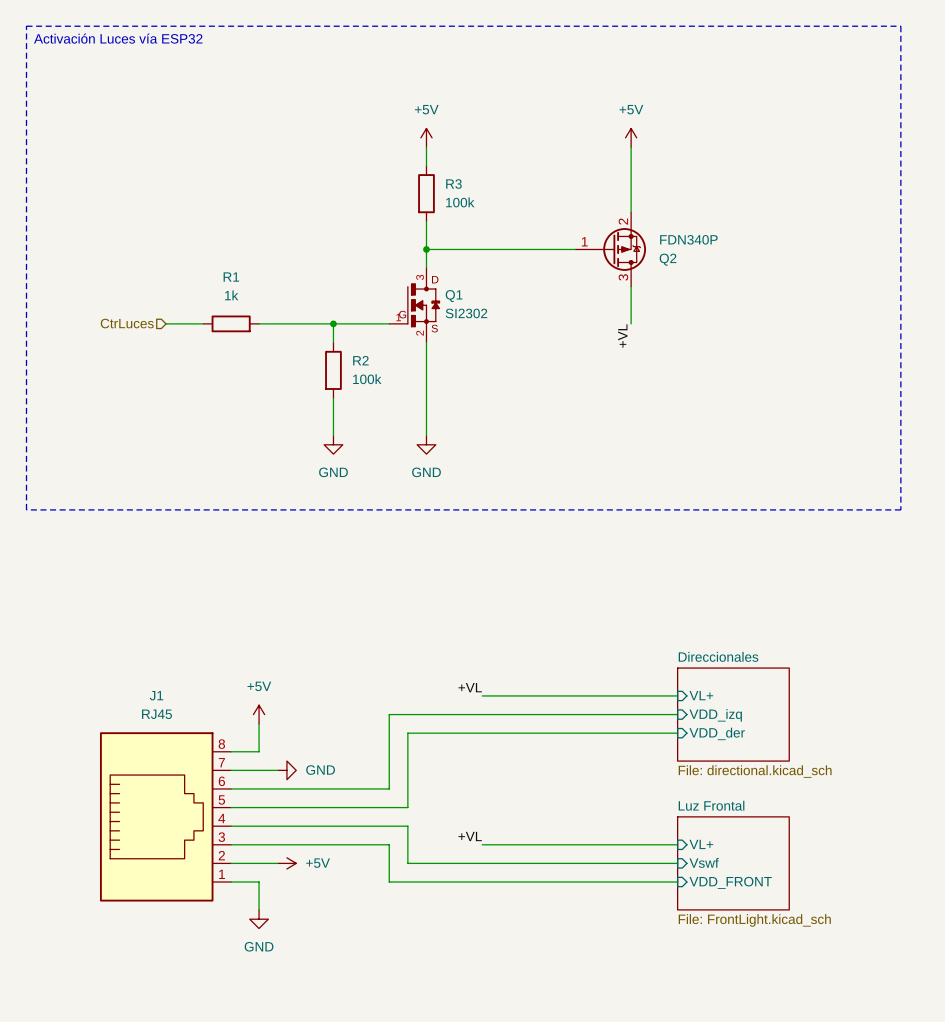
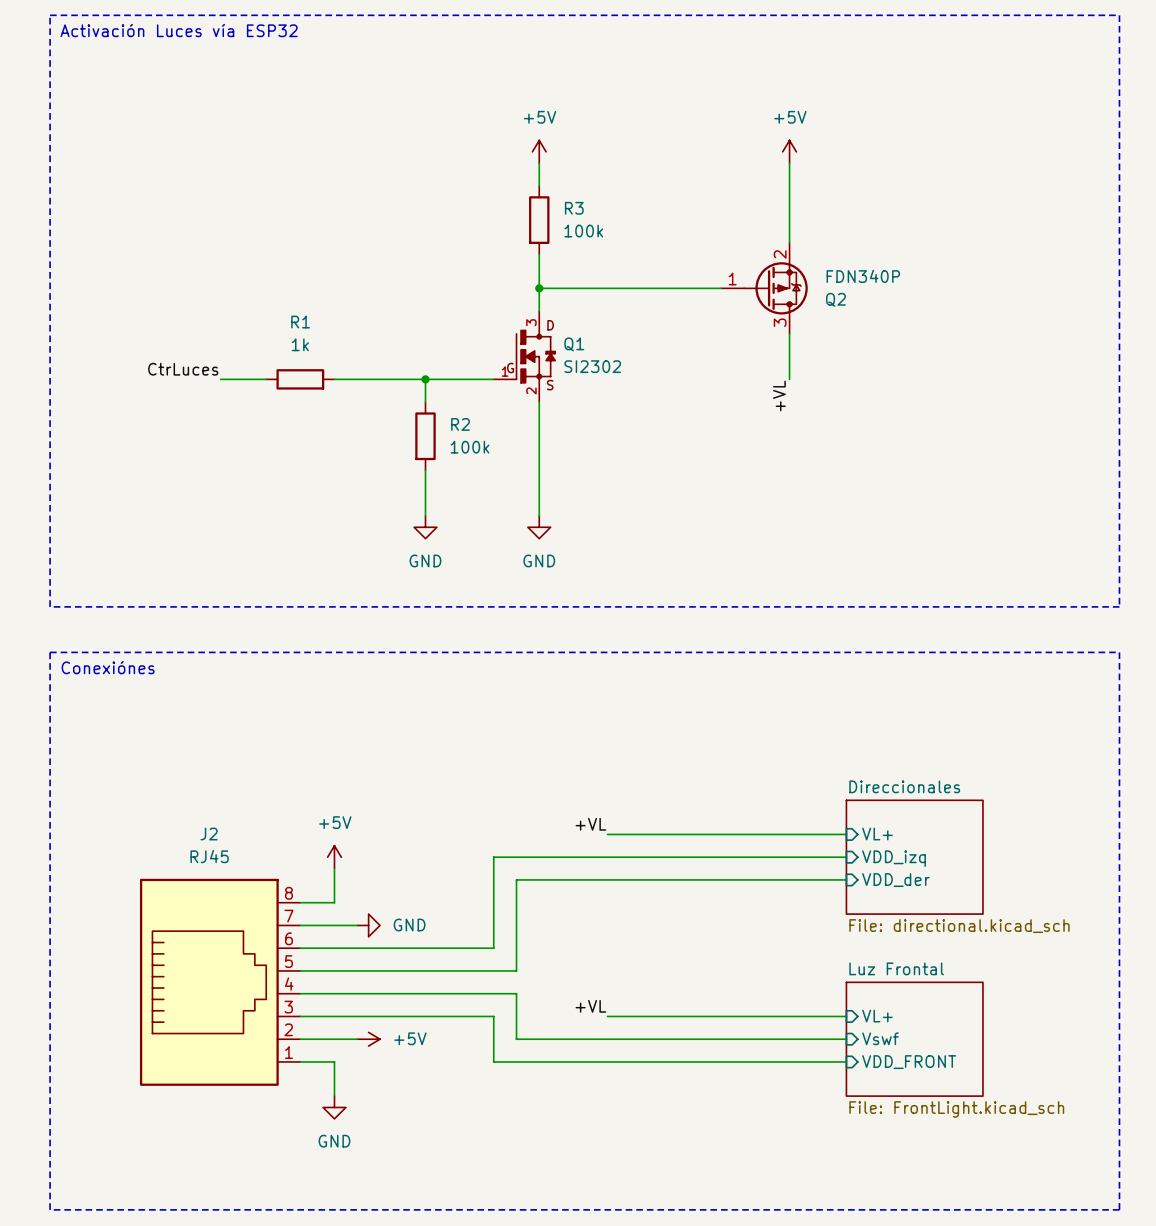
label: none -> CtrLuces (183, 369)
hierarchical label: CtrLuces (127, 323) -> none
line: none -> (50, 652) (1119, 652) (1119, 1209) (50, 1209) (50, 652)
text: none -> Conexiónes (108, 667)
J1 name: J1 (156, 695) -> J2 (209, 834)

